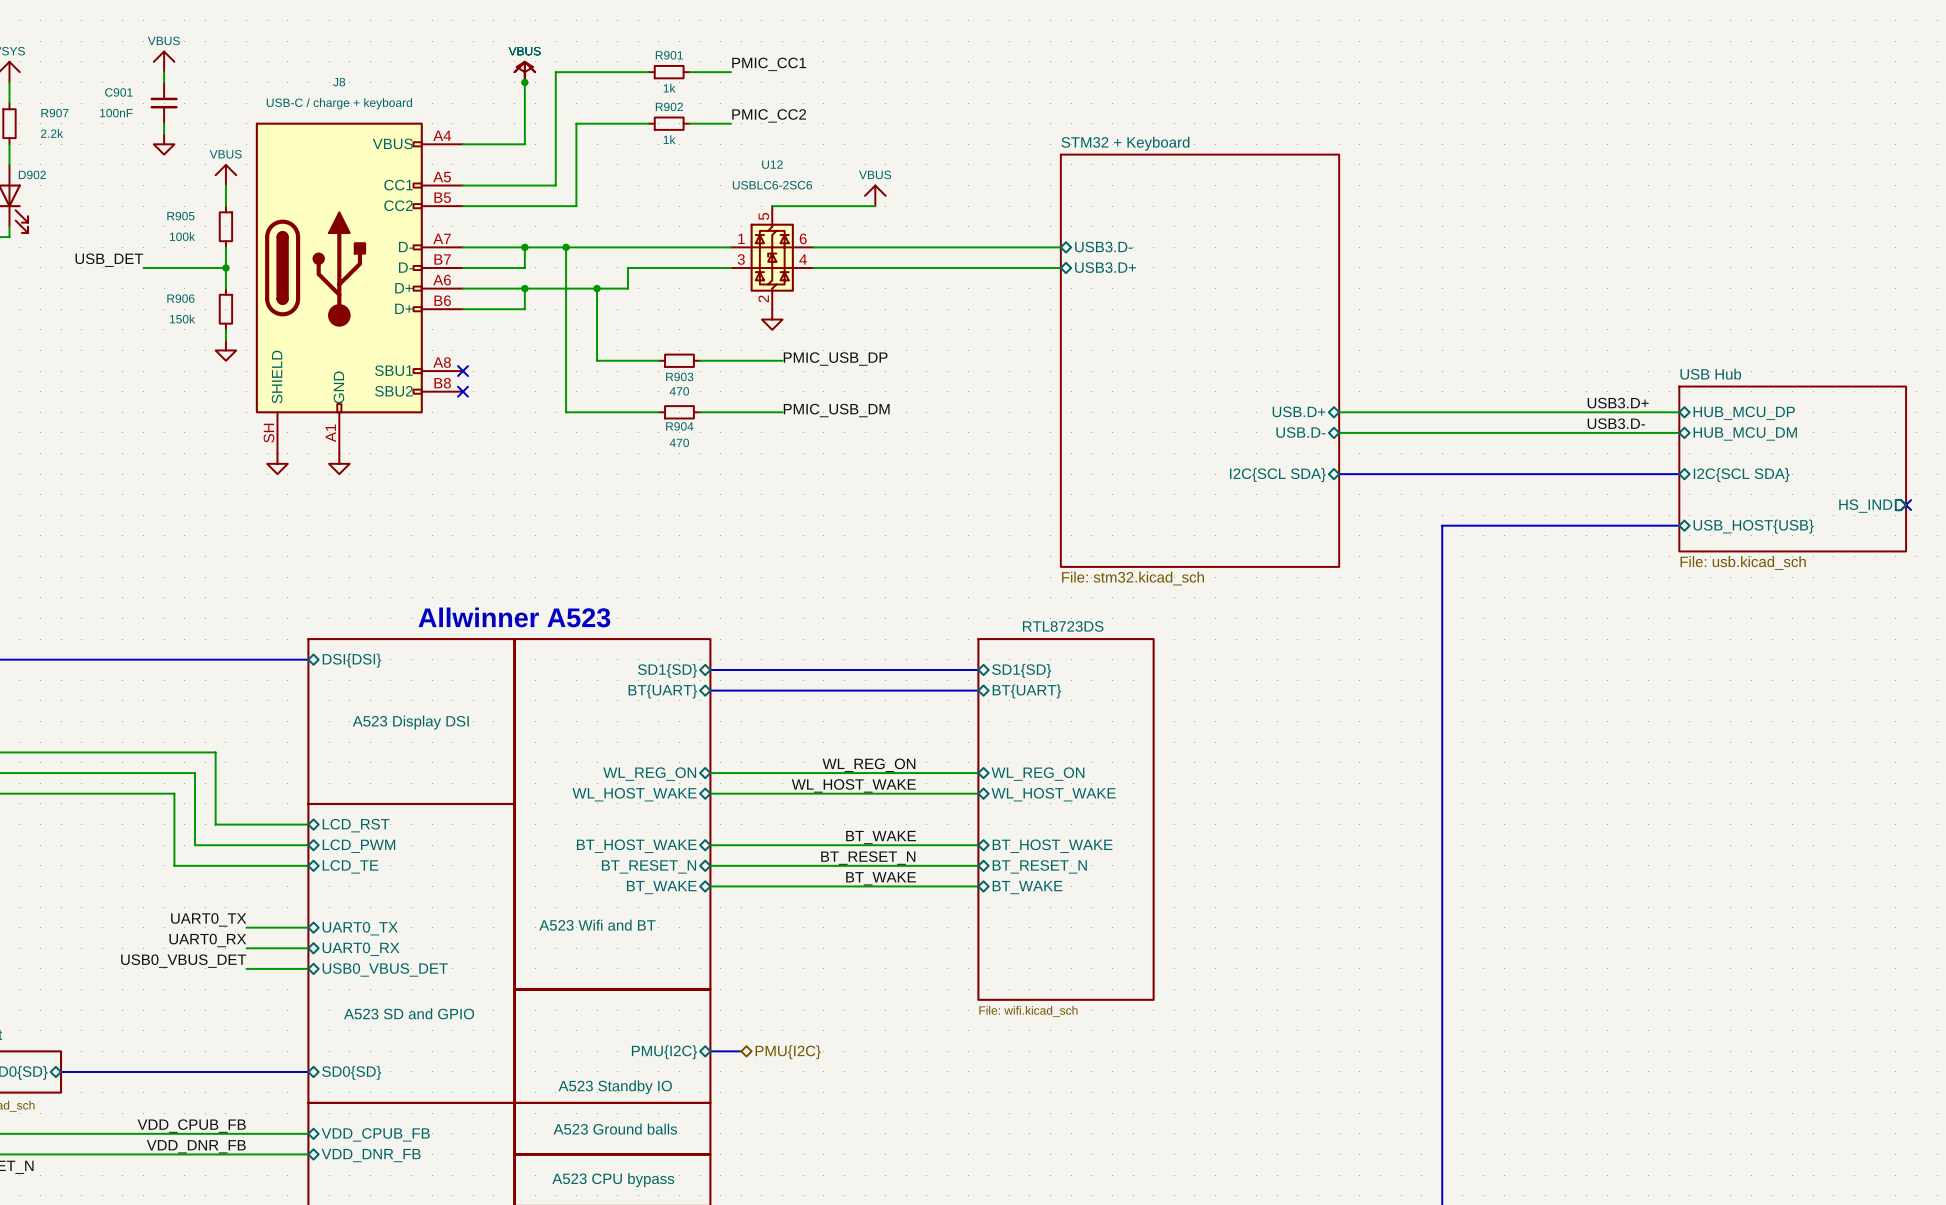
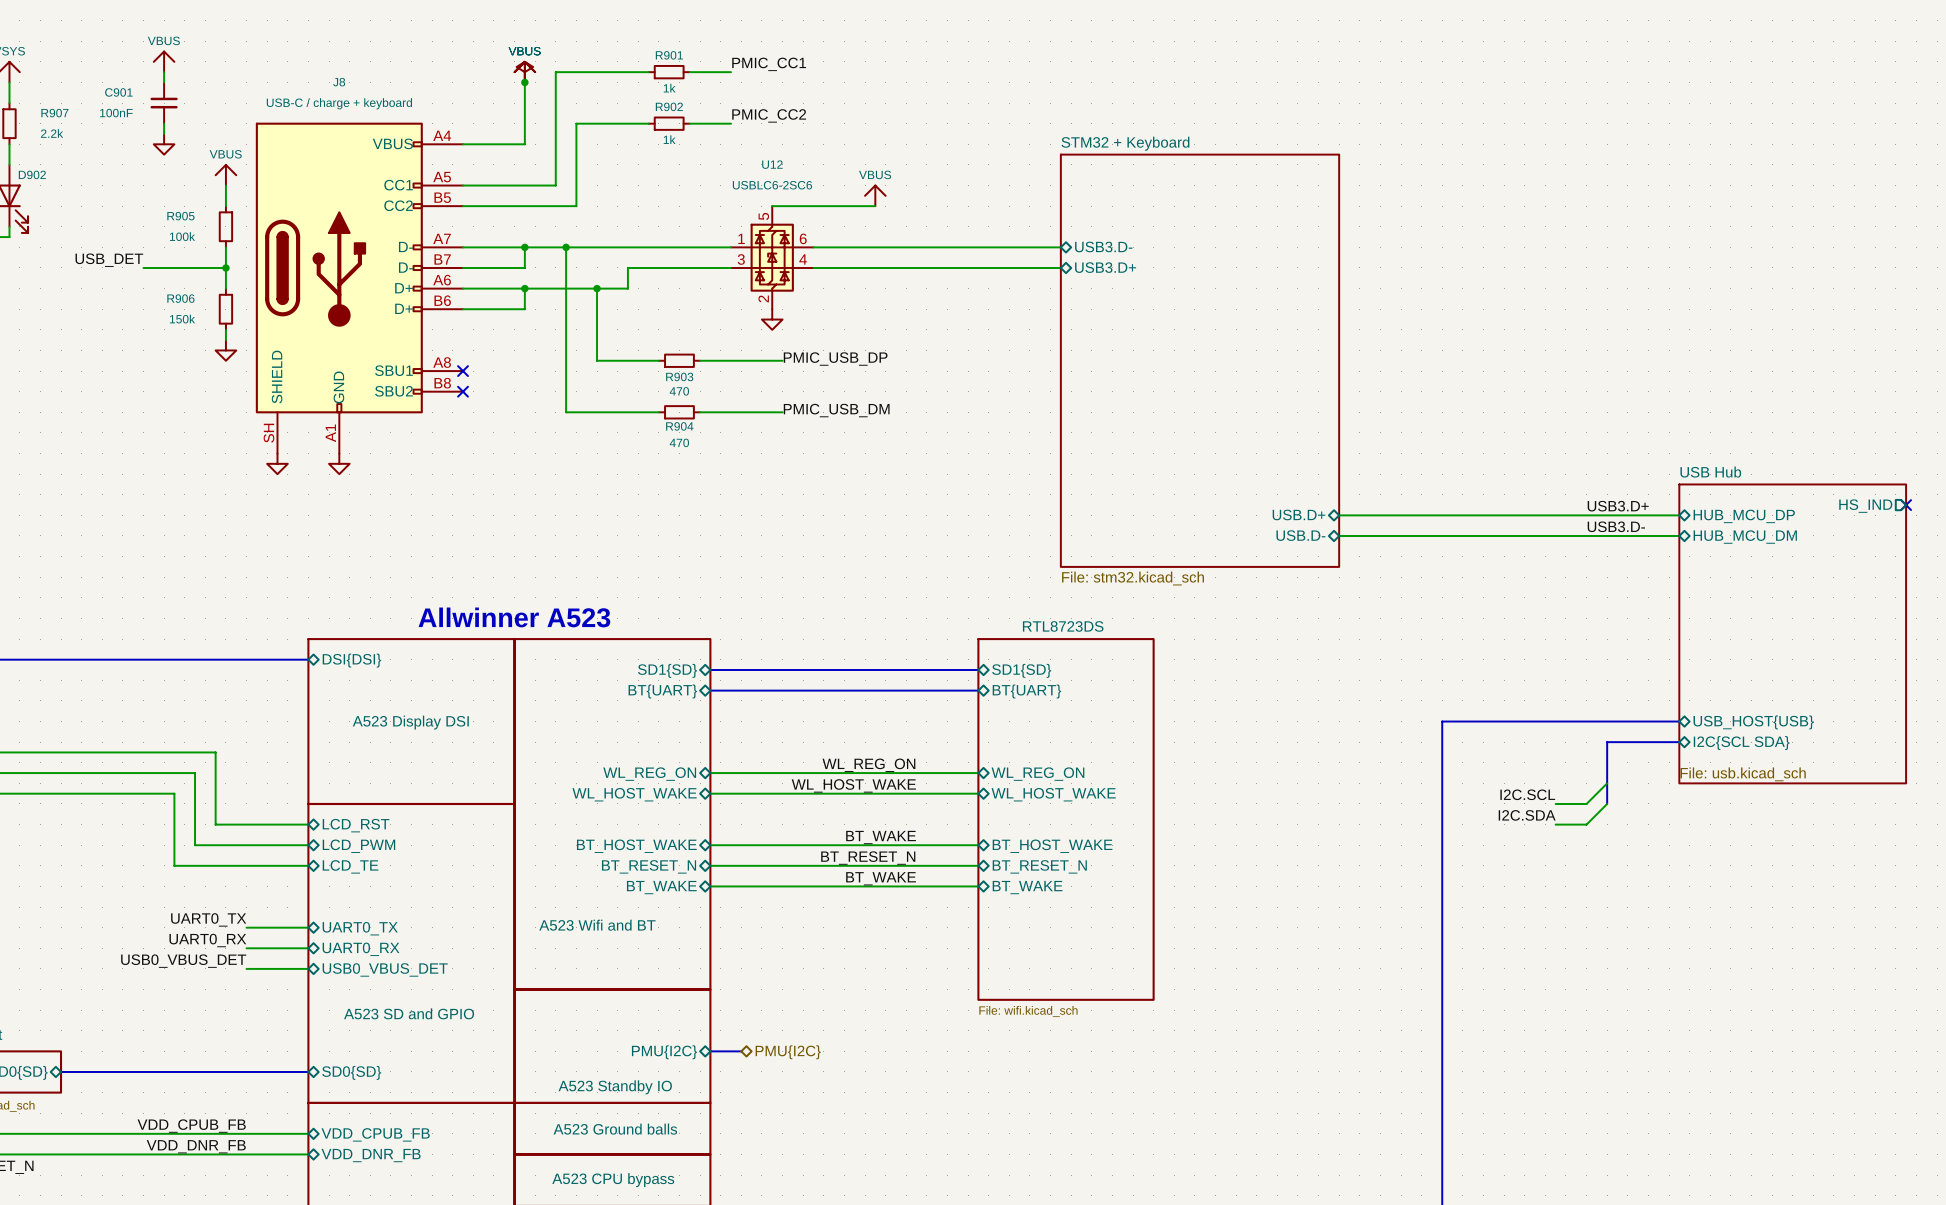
label position: USB3.D+ (1618, 403) -> USB3.D+ (1618, 506)
sheet pin position: USB.D+ (1299, 411) -> USB.D+ (1299, 514)
wire: (1339, 412) (1679, 412) -> (1339, 515) (1679, 515)
sheet pin position: HUB_MCU_DP (1744, 413) -> HUB_MCU_DP (1744, 516)
label position: USB3.D- (1616, 423) -> USB3.D- (1616, 526)
sheet pin position: USB.D- (1300, 432) -> USB.D- (1300, 535)
wire: (1339, 432) (1679, 432) -> (1339, 535) (1679, 535)
sheet pin position: HUB_MCU_DM (1745, 433) -> HUB_MCU_DM (1745, 537)
sheet USB Hub: File: usb.kicad_sch (1792, 468) -> none
bus: (1339, 474) (1679, 474) -> none
sheet pin: I2C{SCL SDA} (1277, 475) -> none
sheet pin: I2C{SCL SDA} (1741, 475) -> none
bus: (1679, 525) (1442, 525) (1442, 721) -> (1679, 721) (1442, 721)
sheet pin position: USB_HOST{USB} (1753, 526) -> USB_HOST{USB} (1753, 722)
sheet USB Hub: none -> File: usb.kicad_sch (1792, 633)
bus: none -> (1679, 742) (1607, 742) (1607, 803)
sheet pin: none -> I2C{SCL SDA} (1741, 743)
wire: none -> (1607, 783) (1586, 803) (1555, 803)
label: none -> I2C.SCL (1527, 794)
wire: none -> (1607, 803) (1586, 824) (1555, 824)
label: none -> I2C.SDA (1527, 815)

